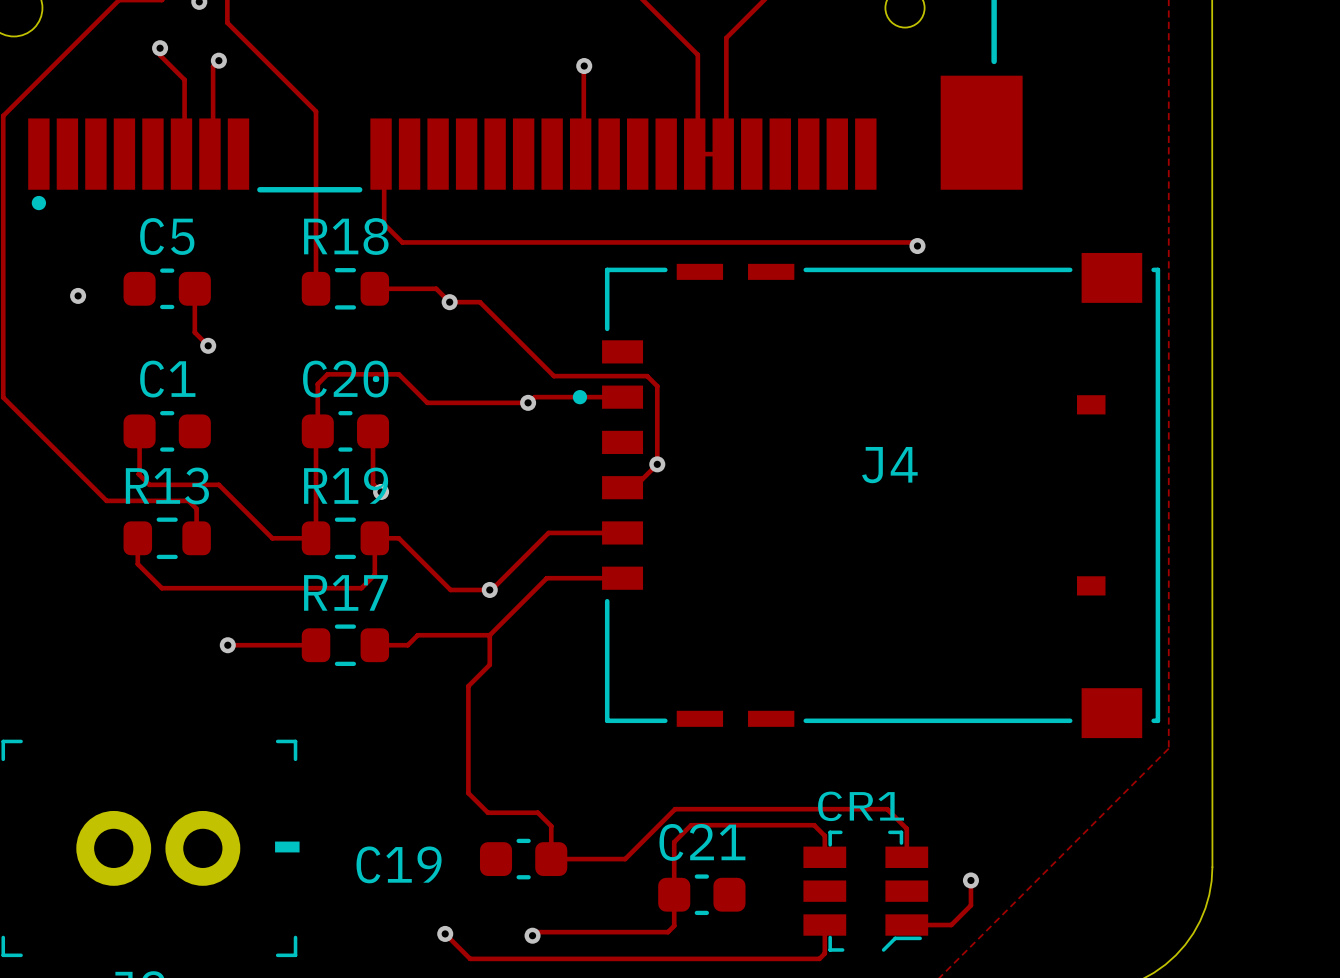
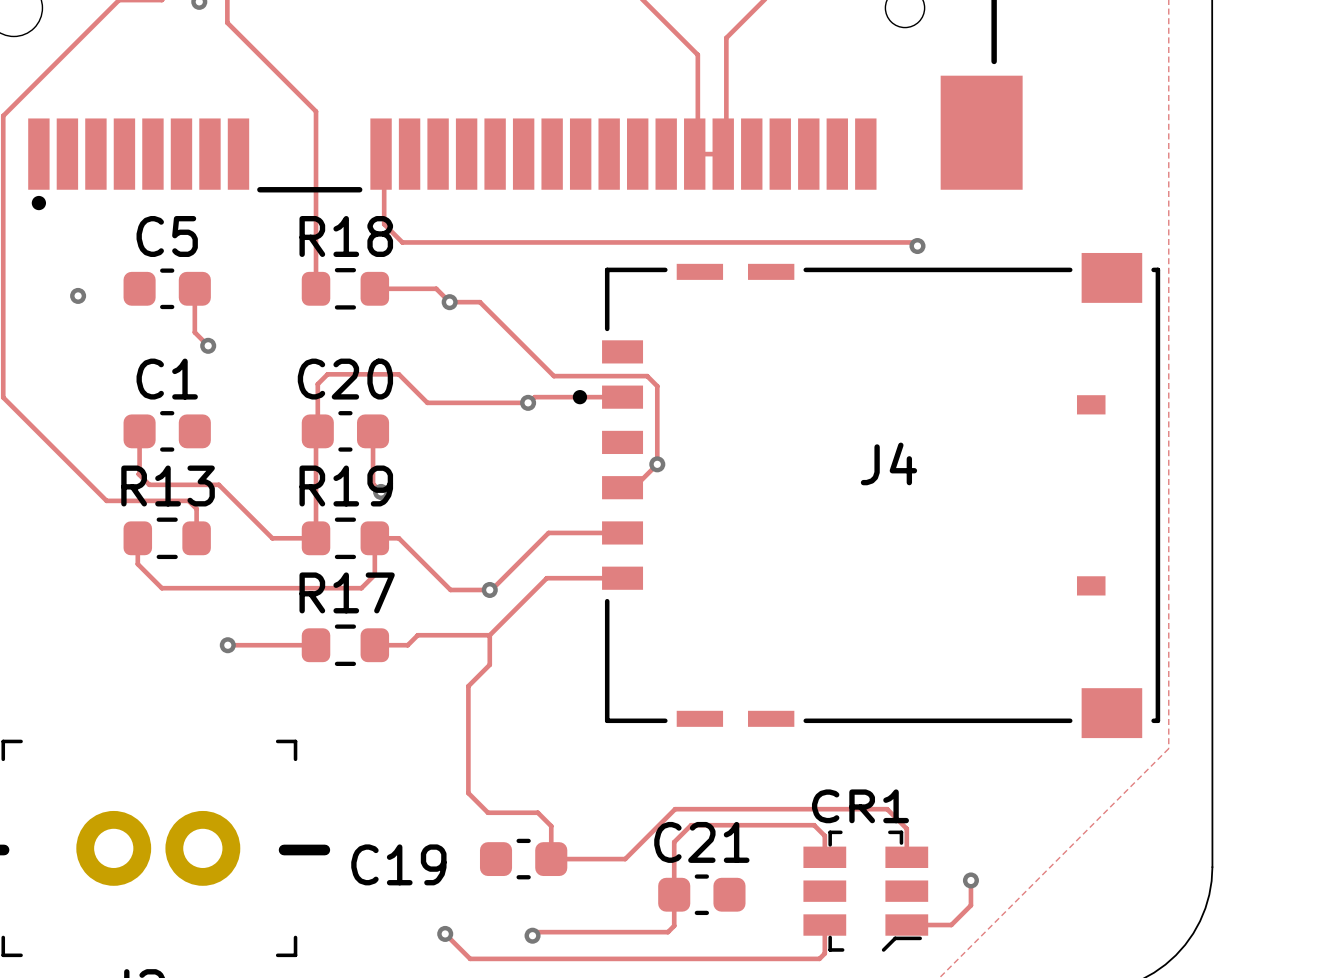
track: (160, 48) (160, 55) (184, 79) (184, 154) -> none
via: (160, 48) -> none
track: (218, 60) (213, 66) (213, 154) -> none
via: (218, 60) -> none
track: (583, 66) (583, 154) -> none
via: (584, 66) -> none

